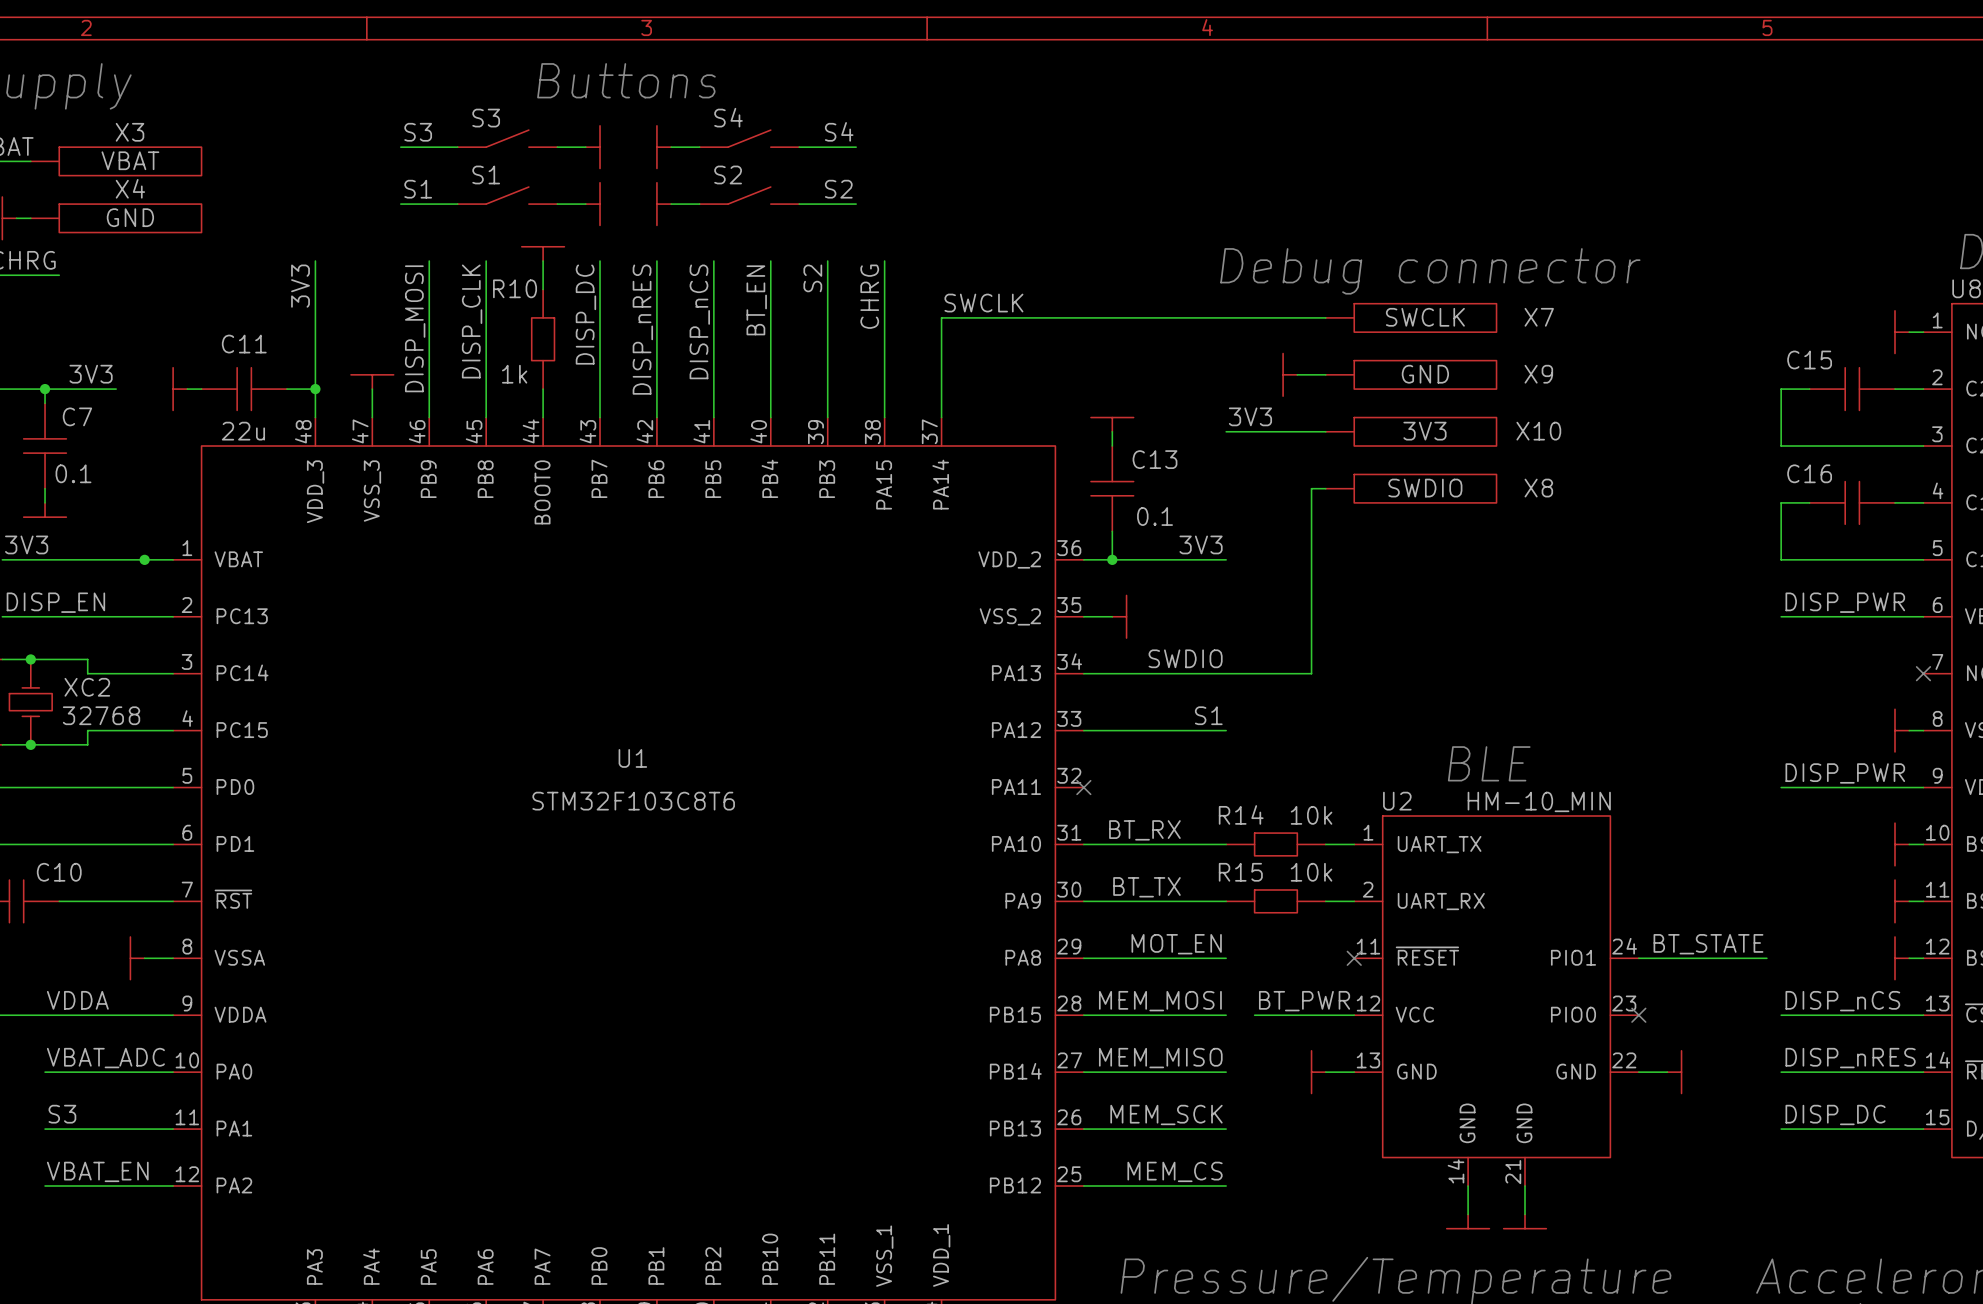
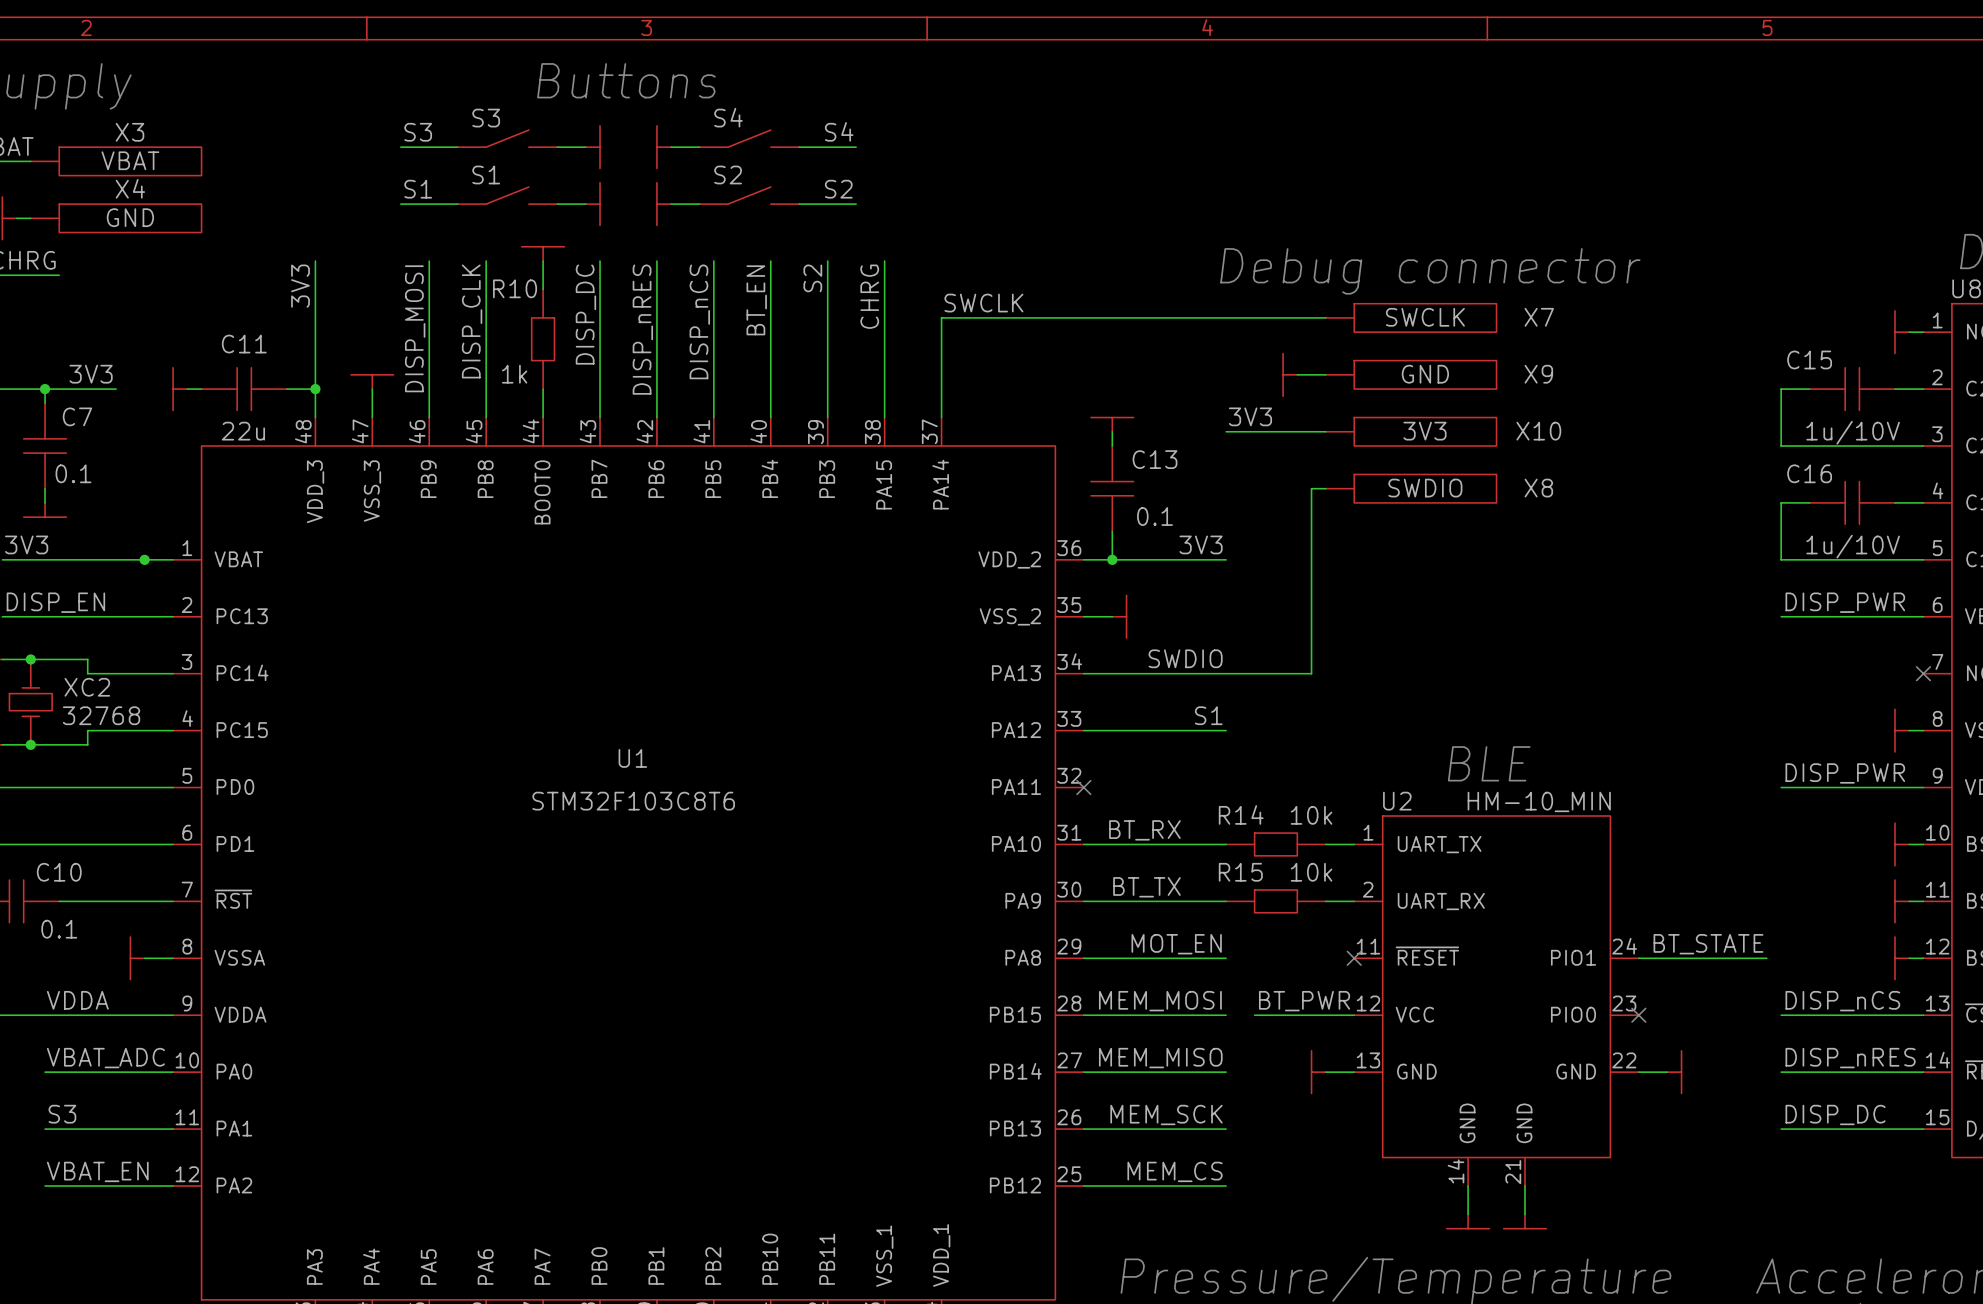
C15 value: none -> 1u/10V (1853, 432)
C16 value: none -> 1u/10V (1853, 546)
C10 value: none -> 0.1 (59, 929)

